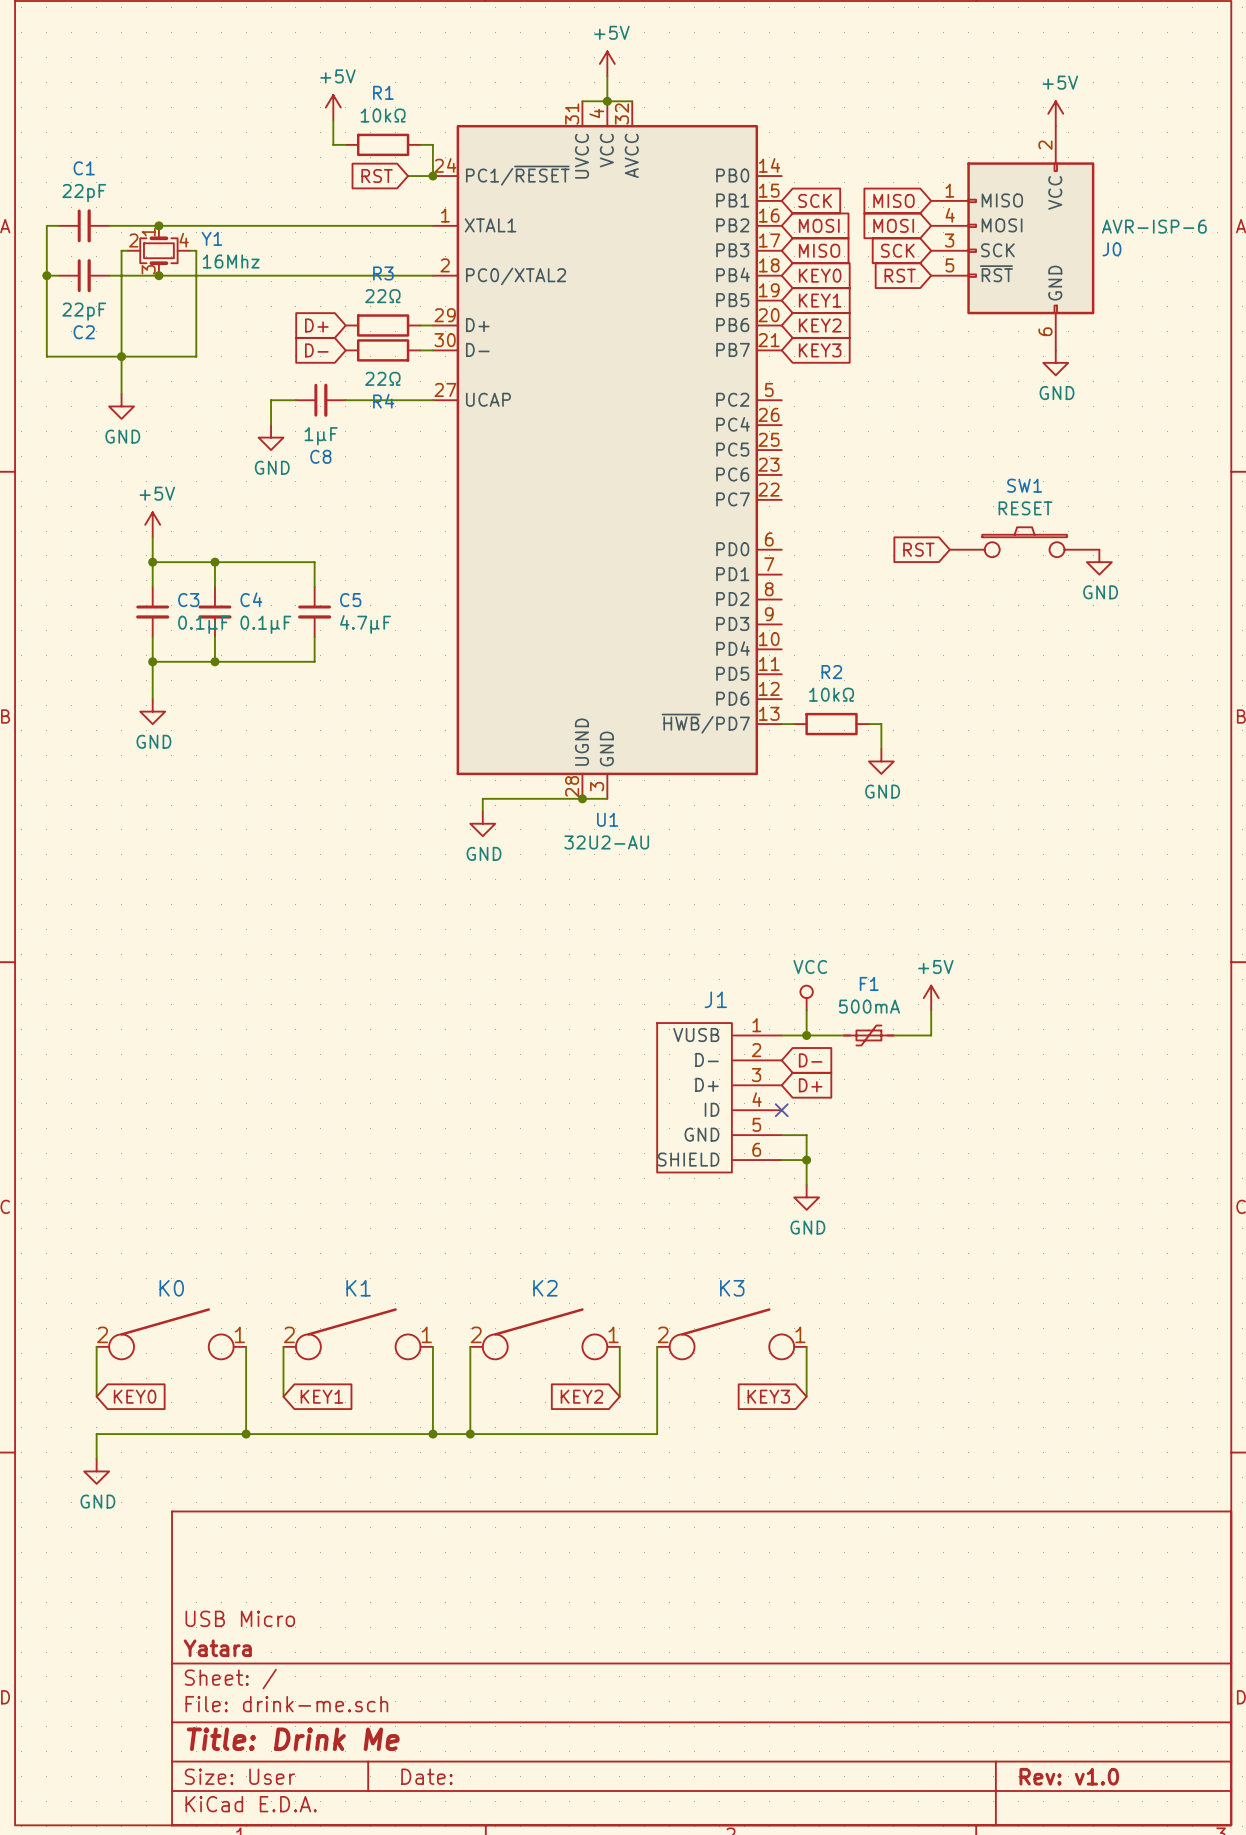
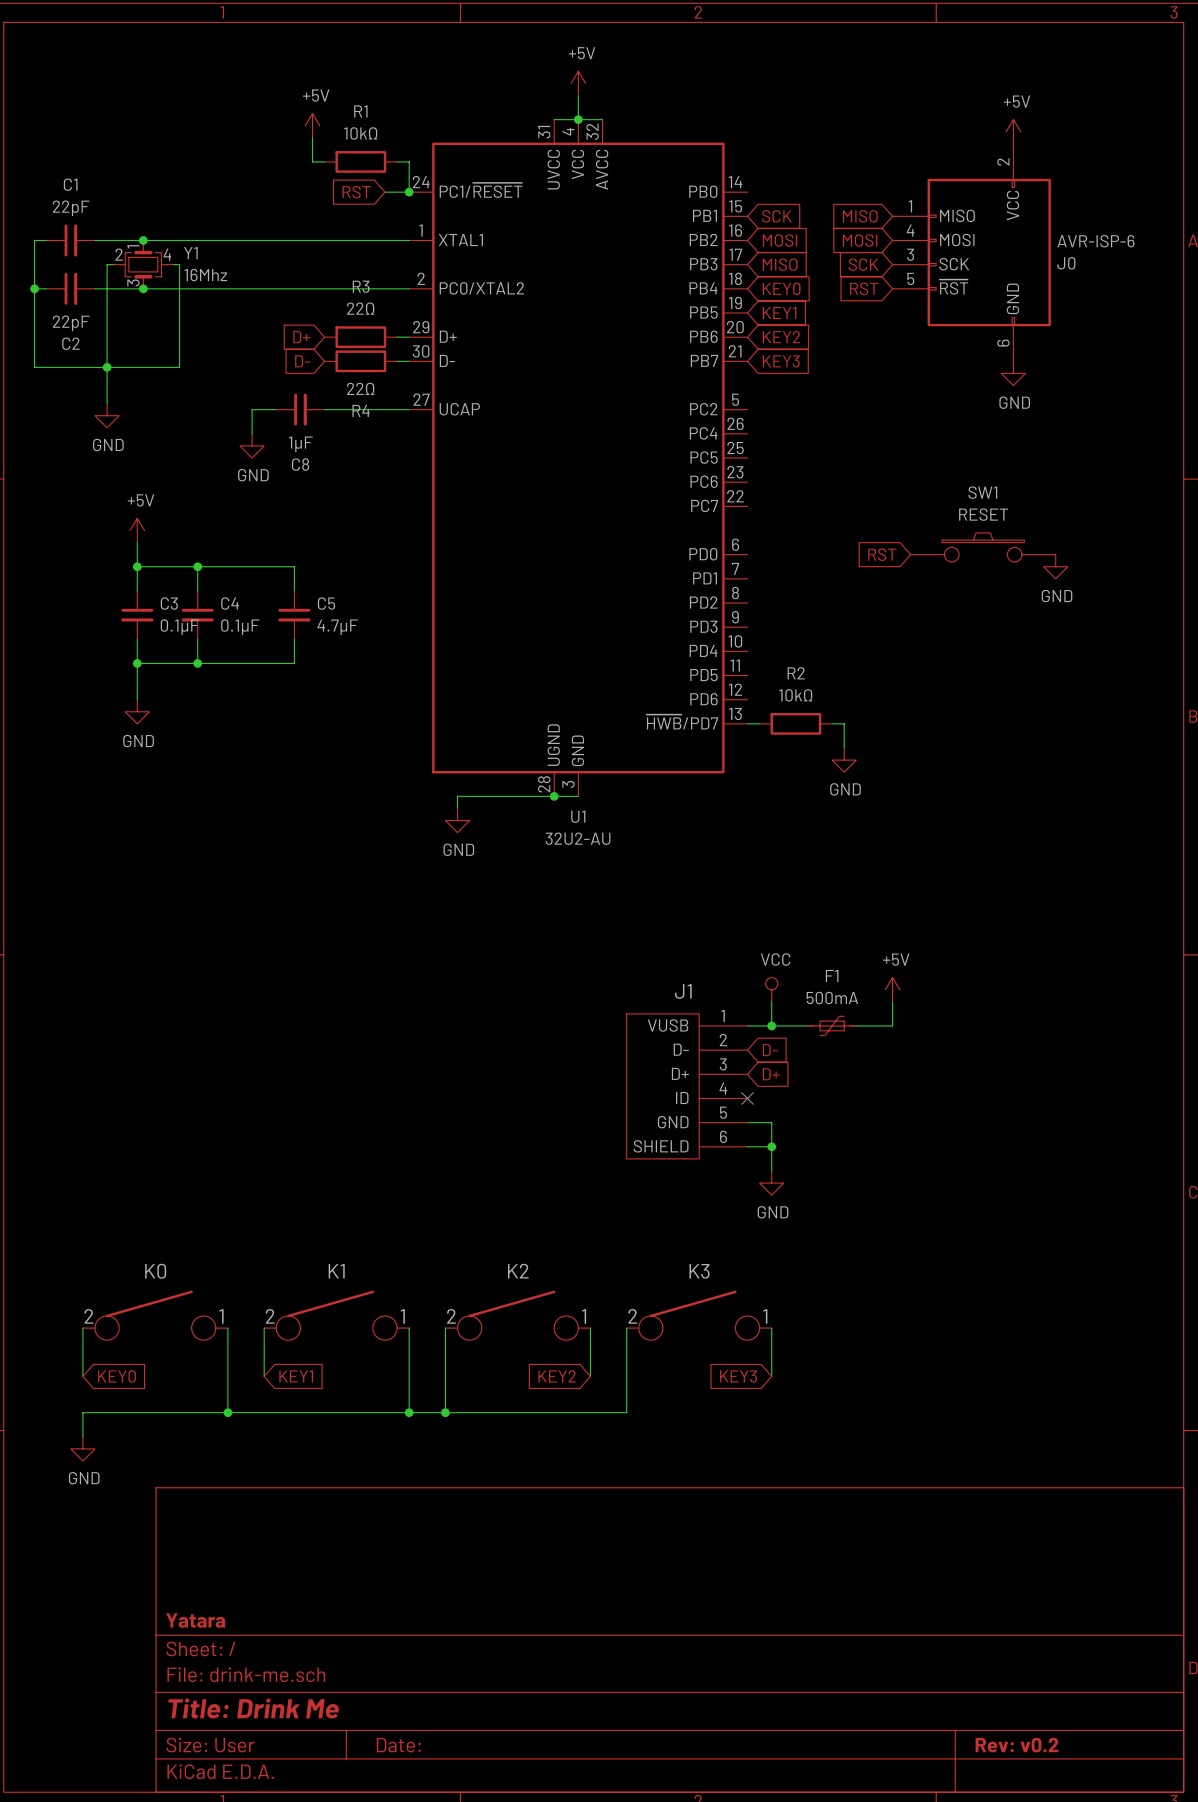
title block: USB Micro (240, 1618) -> none
title block: Rev: v1.0 (1069, 1776) -> Rev: v0.2 (1017, 1745)

